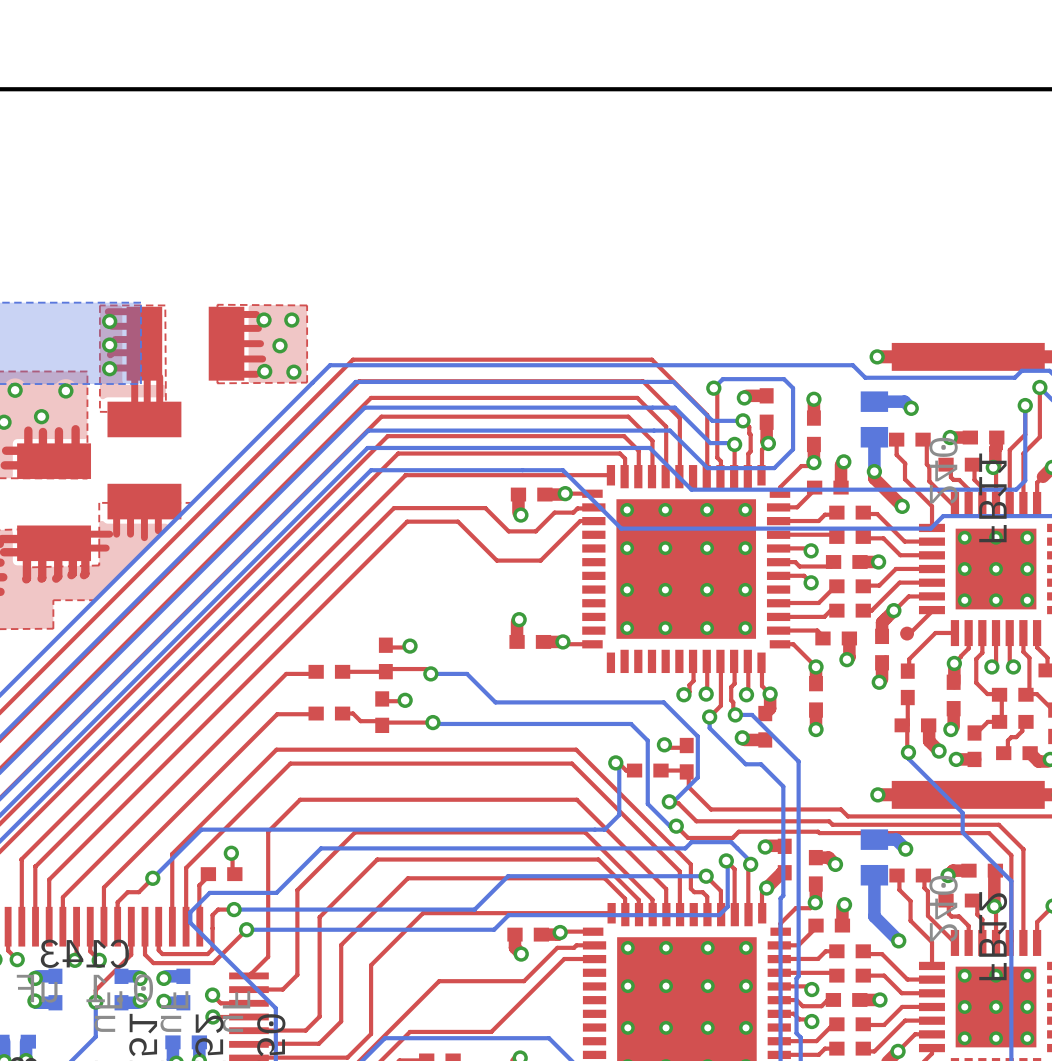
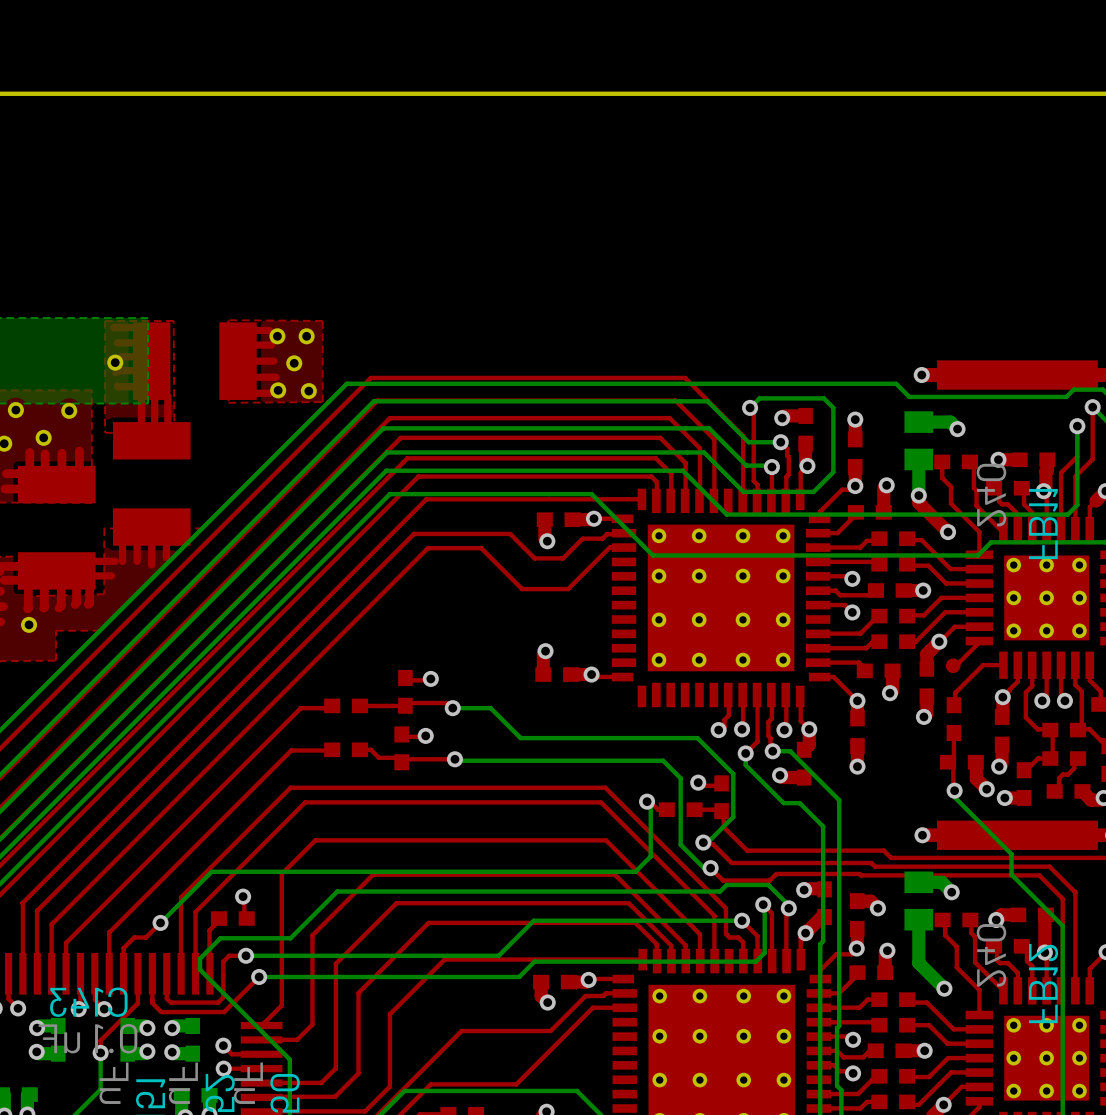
part: (109, 321) -> none
part: (109, 368) -> none
part: none -> (29, 624)

